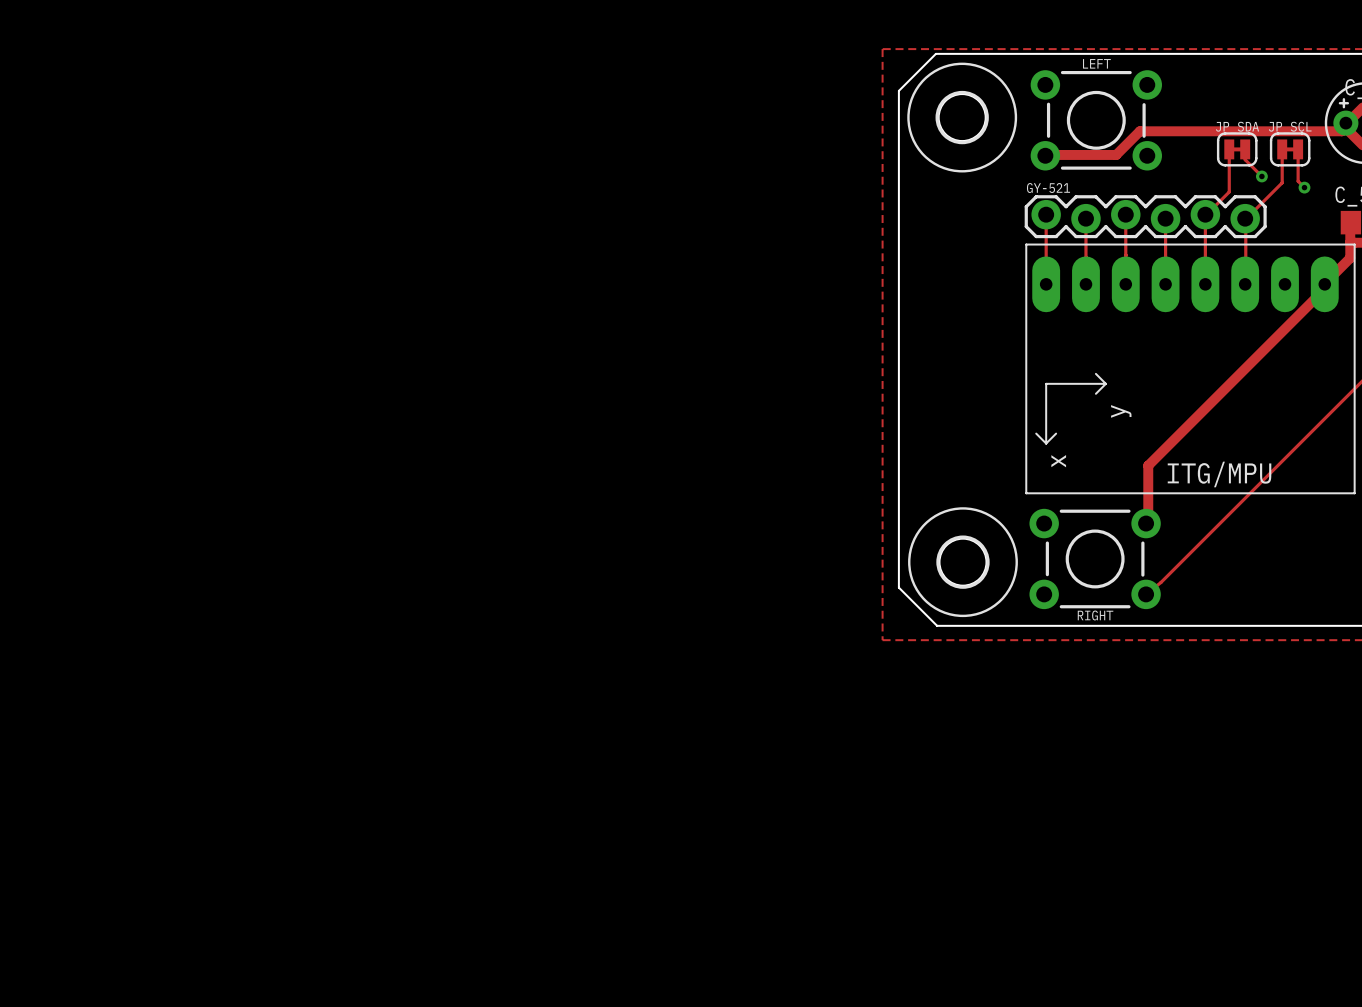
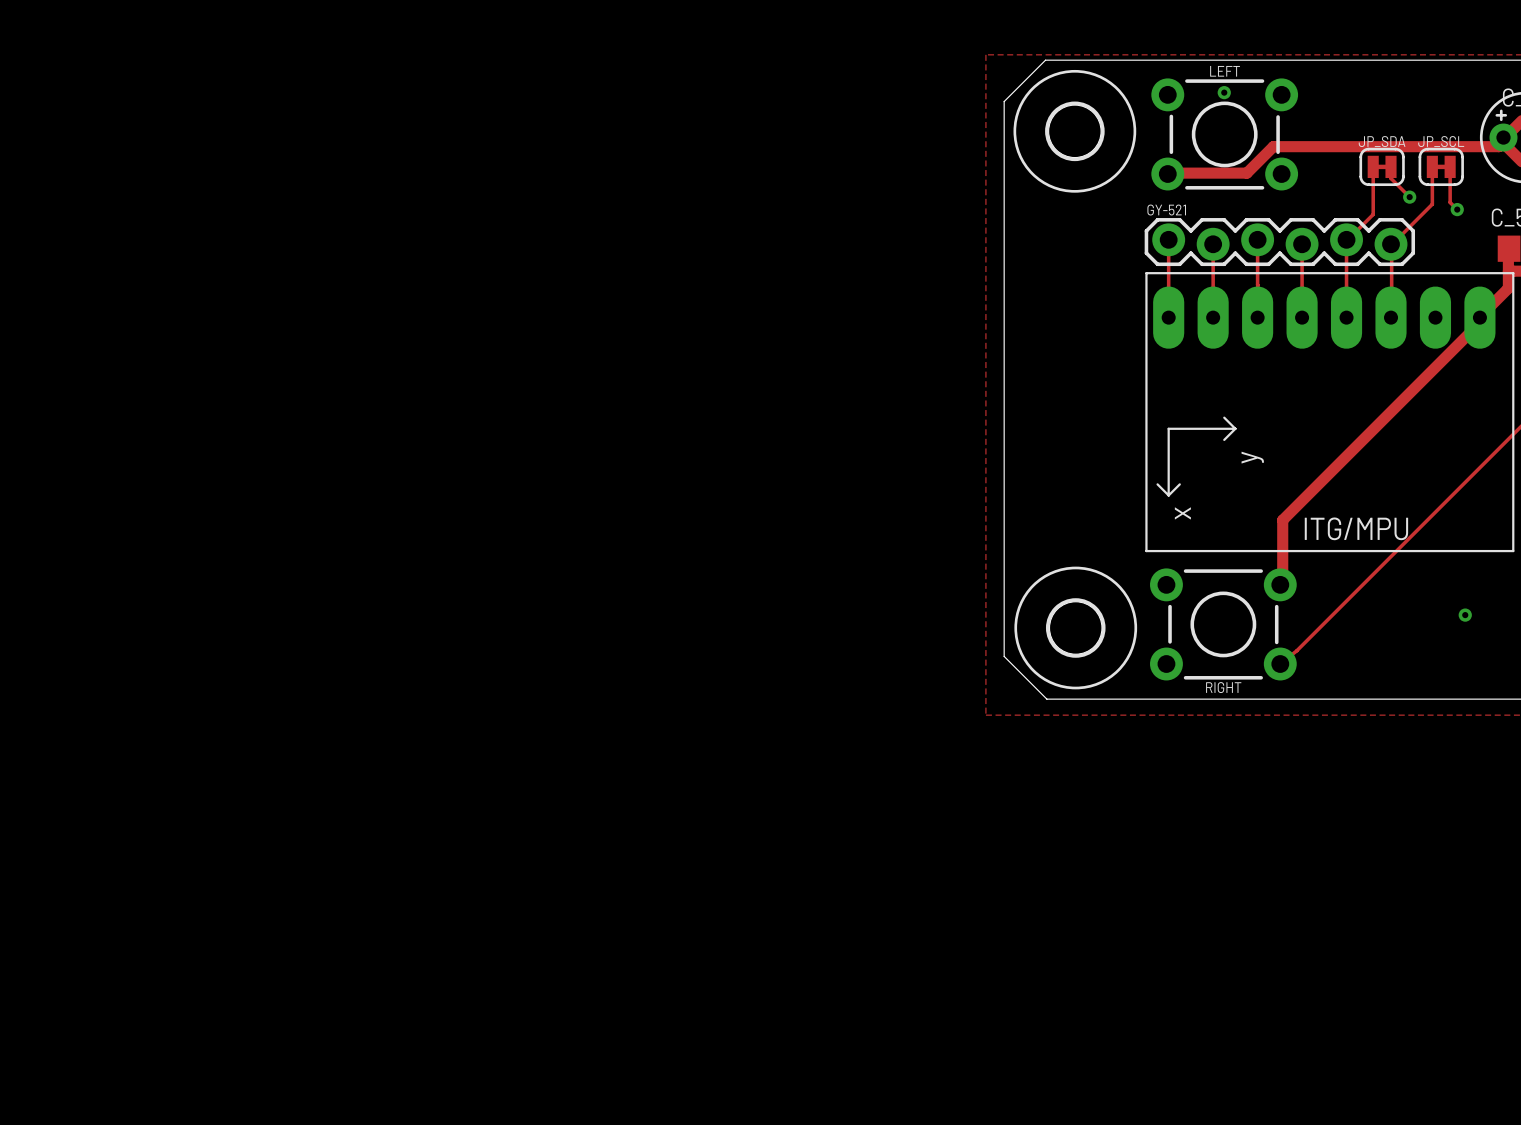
via: none -> (1224, 92)
via: none -> (1465, 615)

